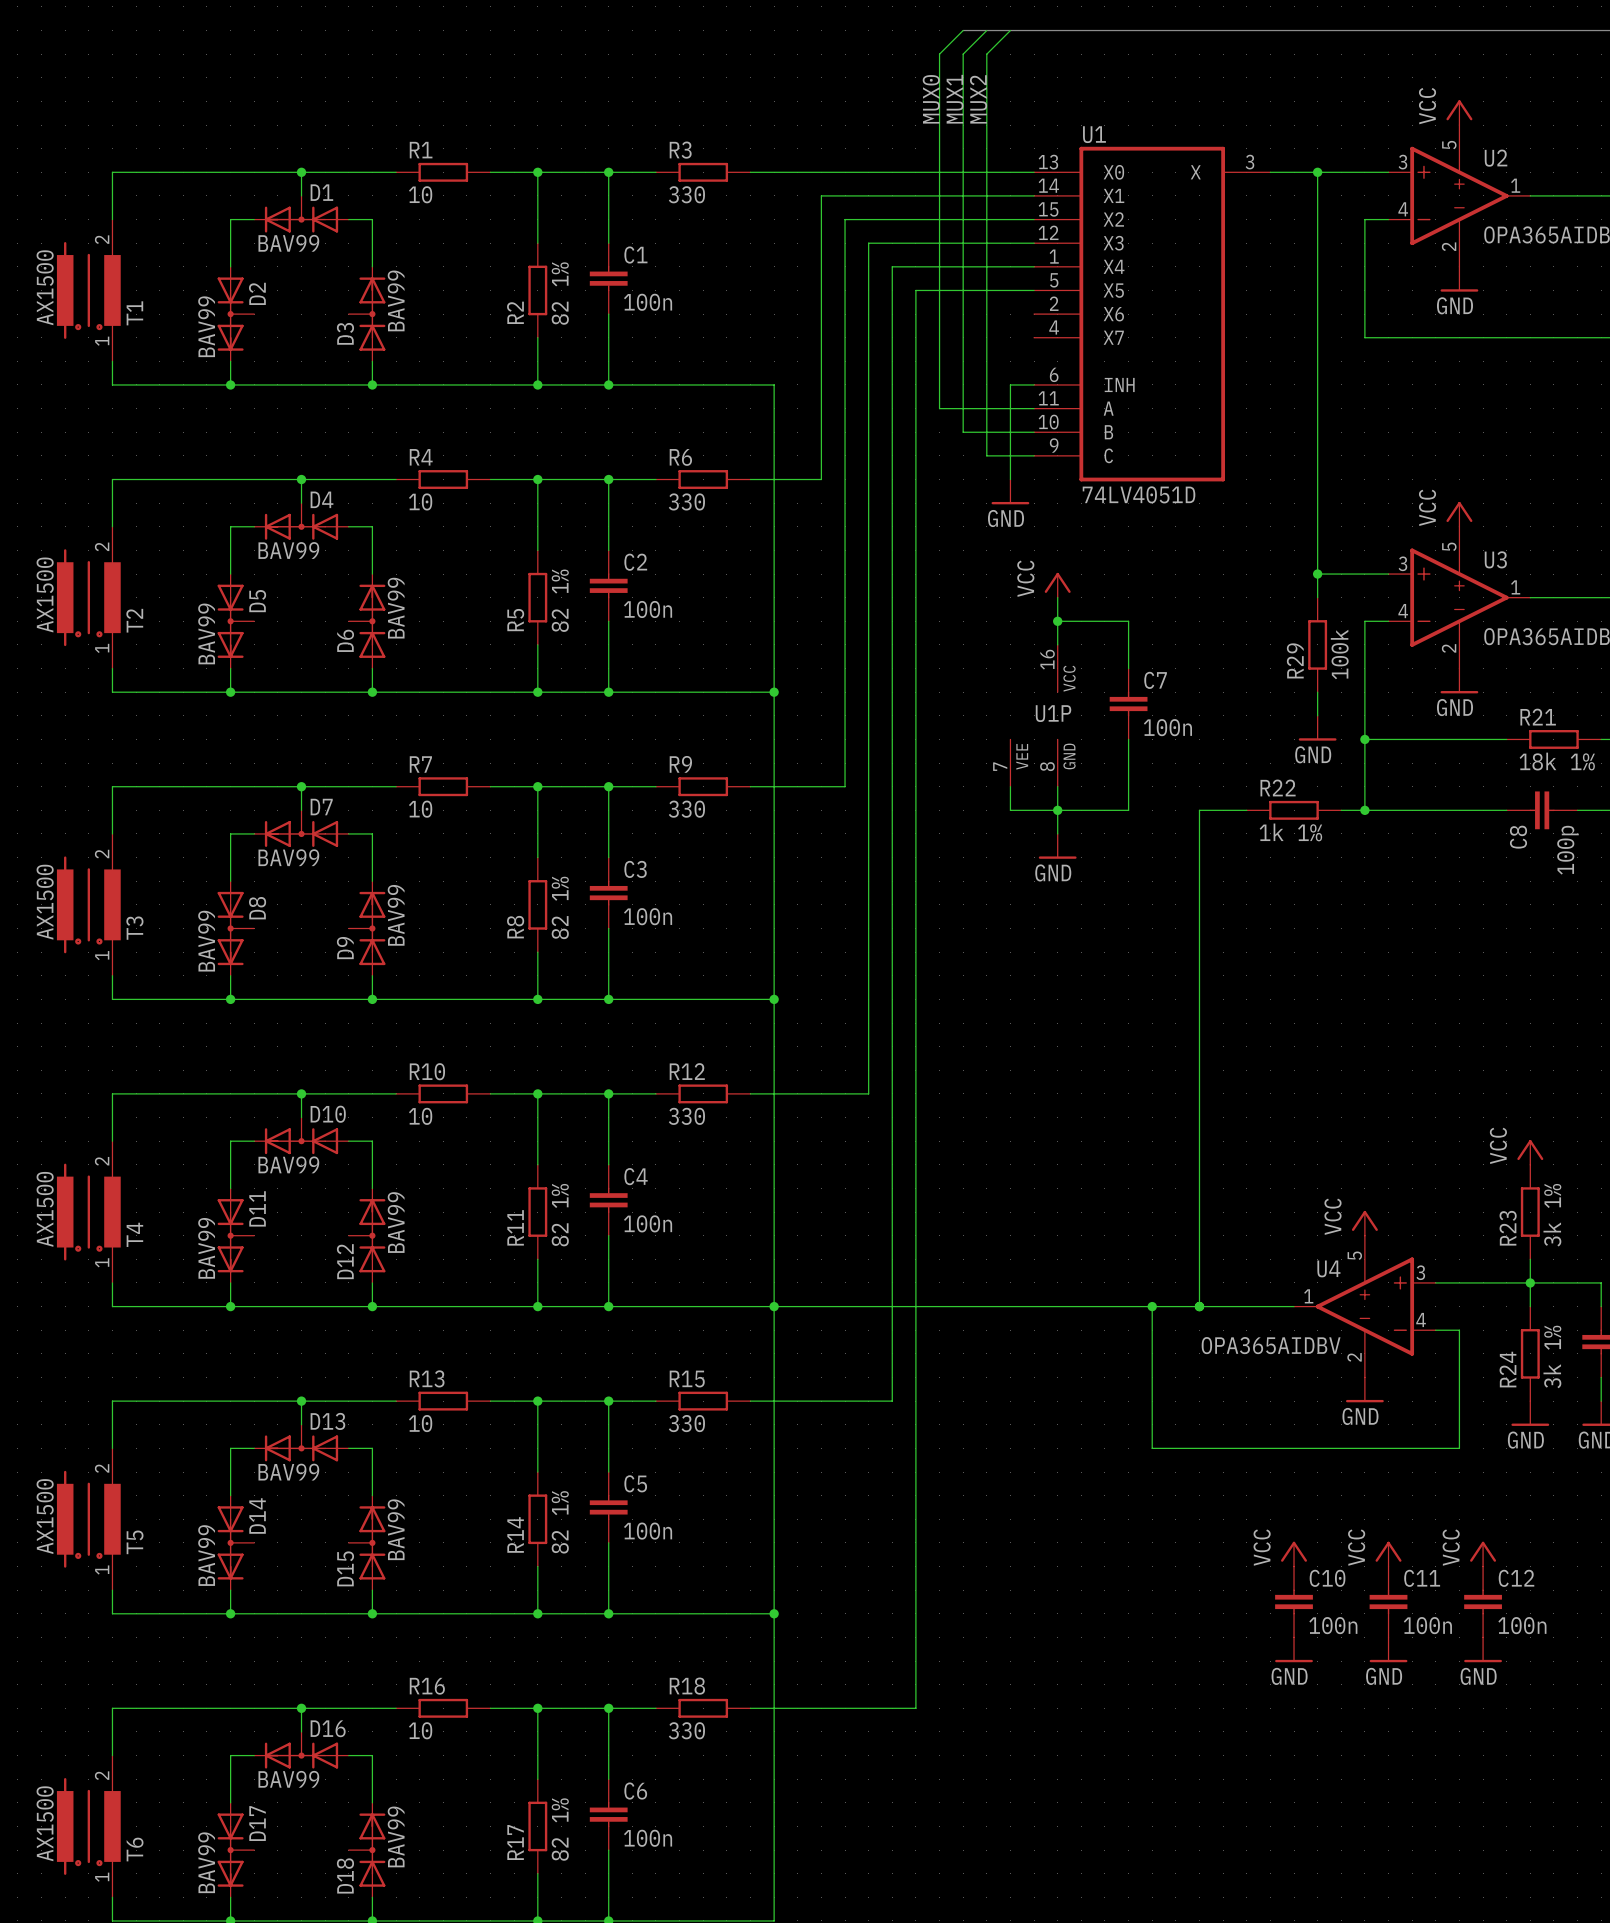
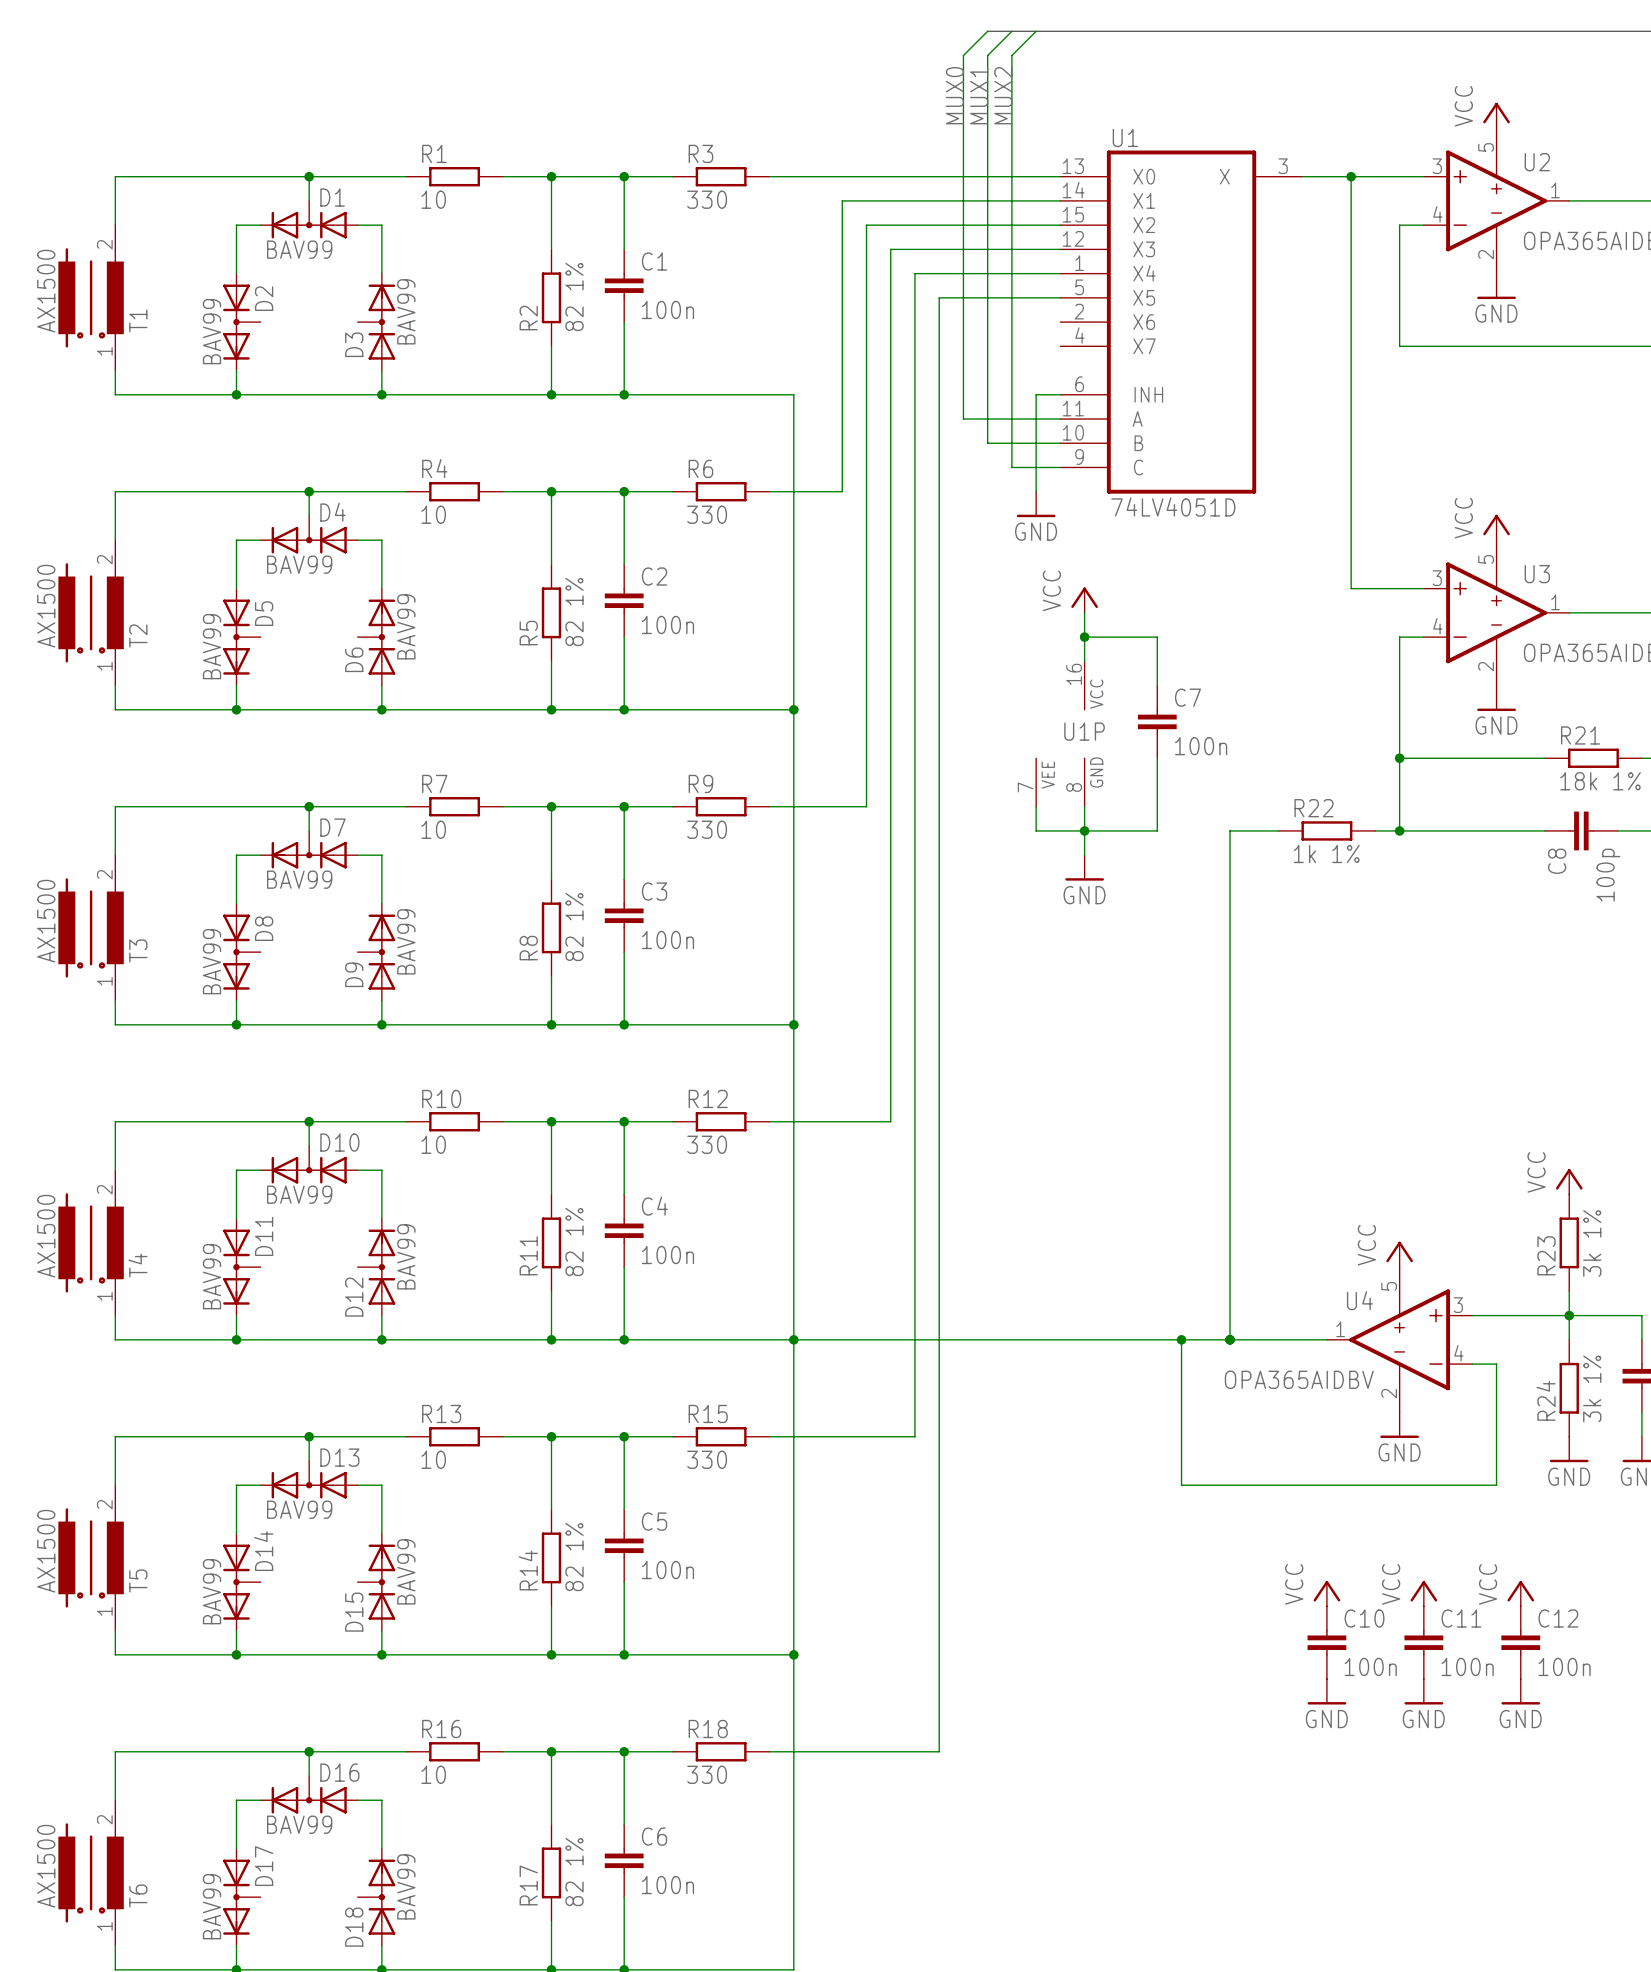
wire: (1317, 574) (1317, 597) -> none
junction: (1317, 574) -> none
R29: 100k (1317, 644) -> none
wire: (1317, 692) (1317, 715) -> none
power symbol: GND (1317, 728) -> none

